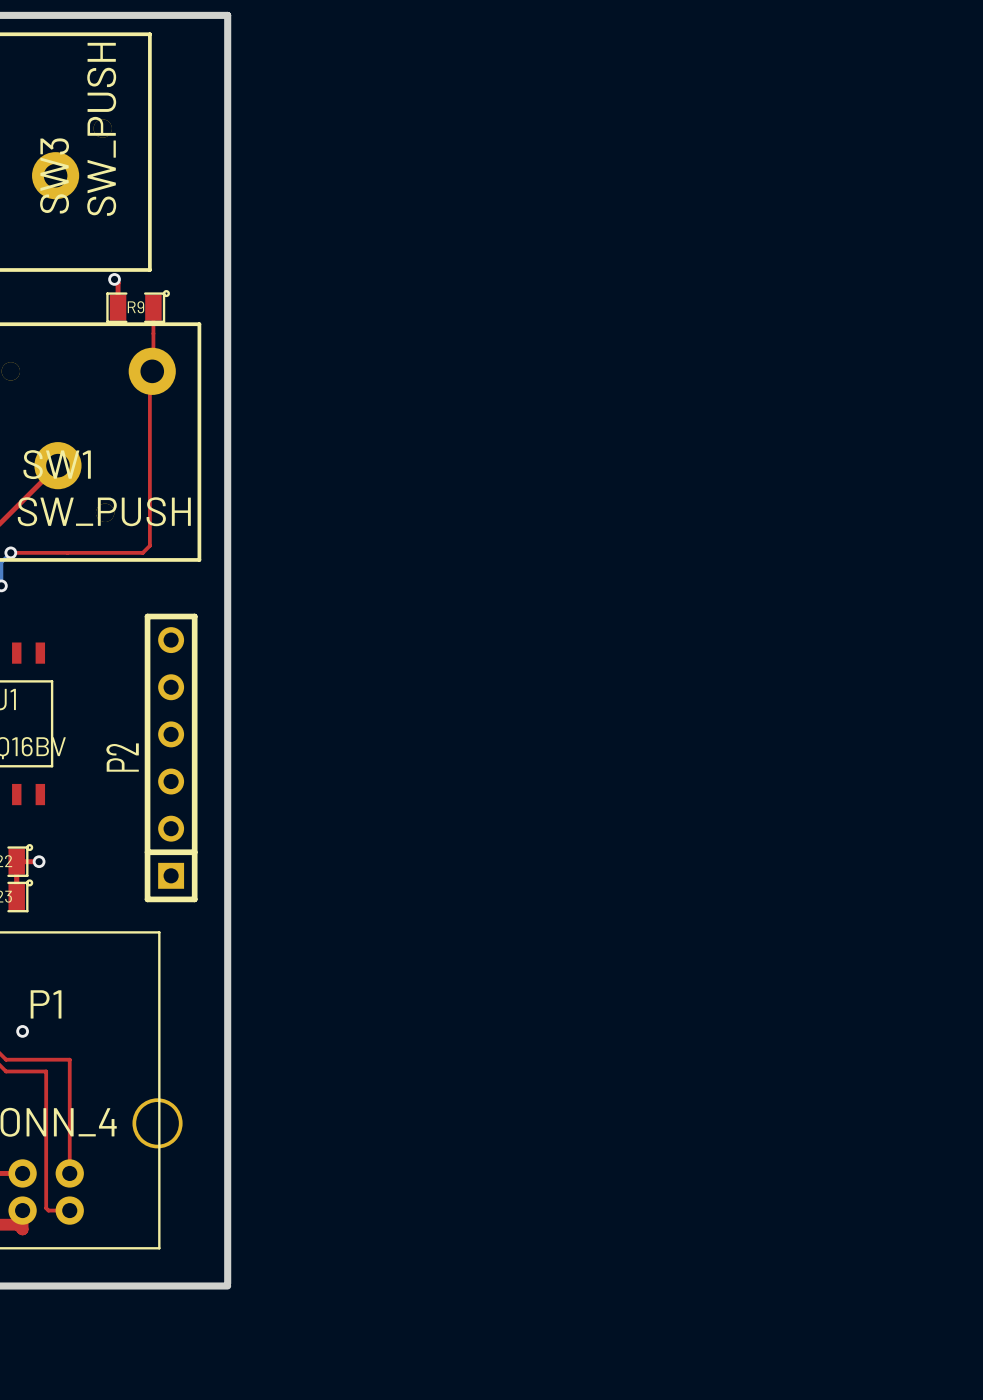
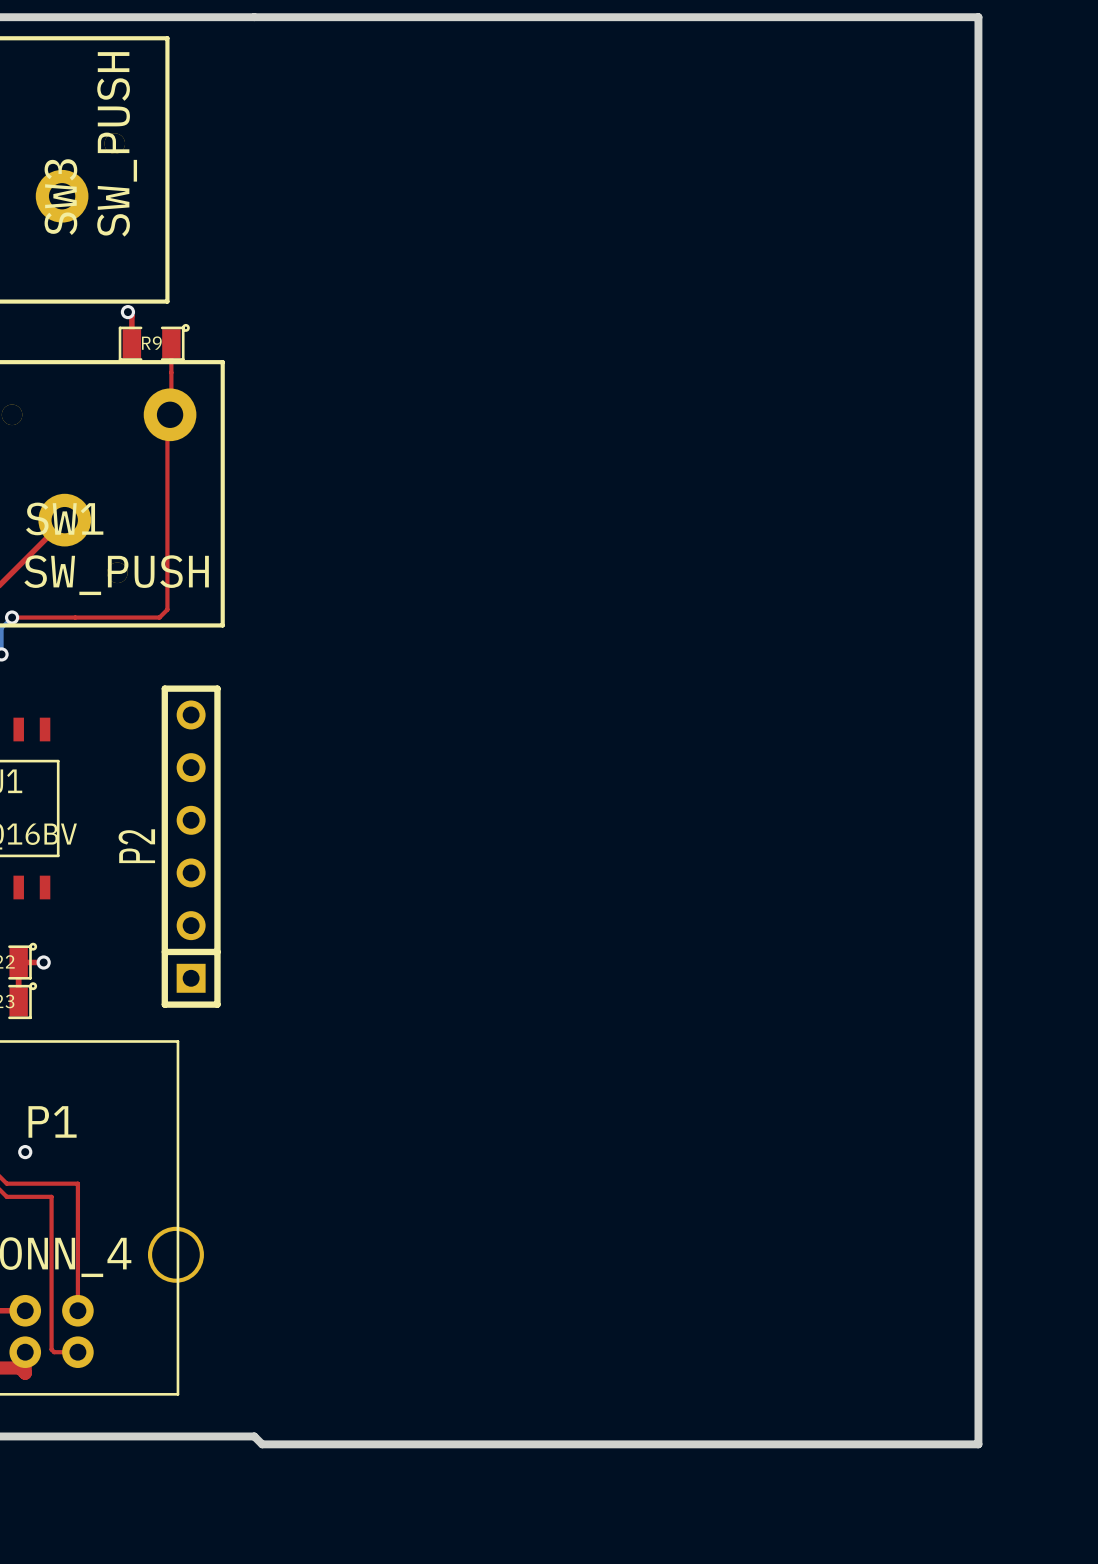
board edge: (227, 15) (227, 1283) -> (254, 17) (978, 17) (978, 1444) (262, 1444) (254, 1436)

